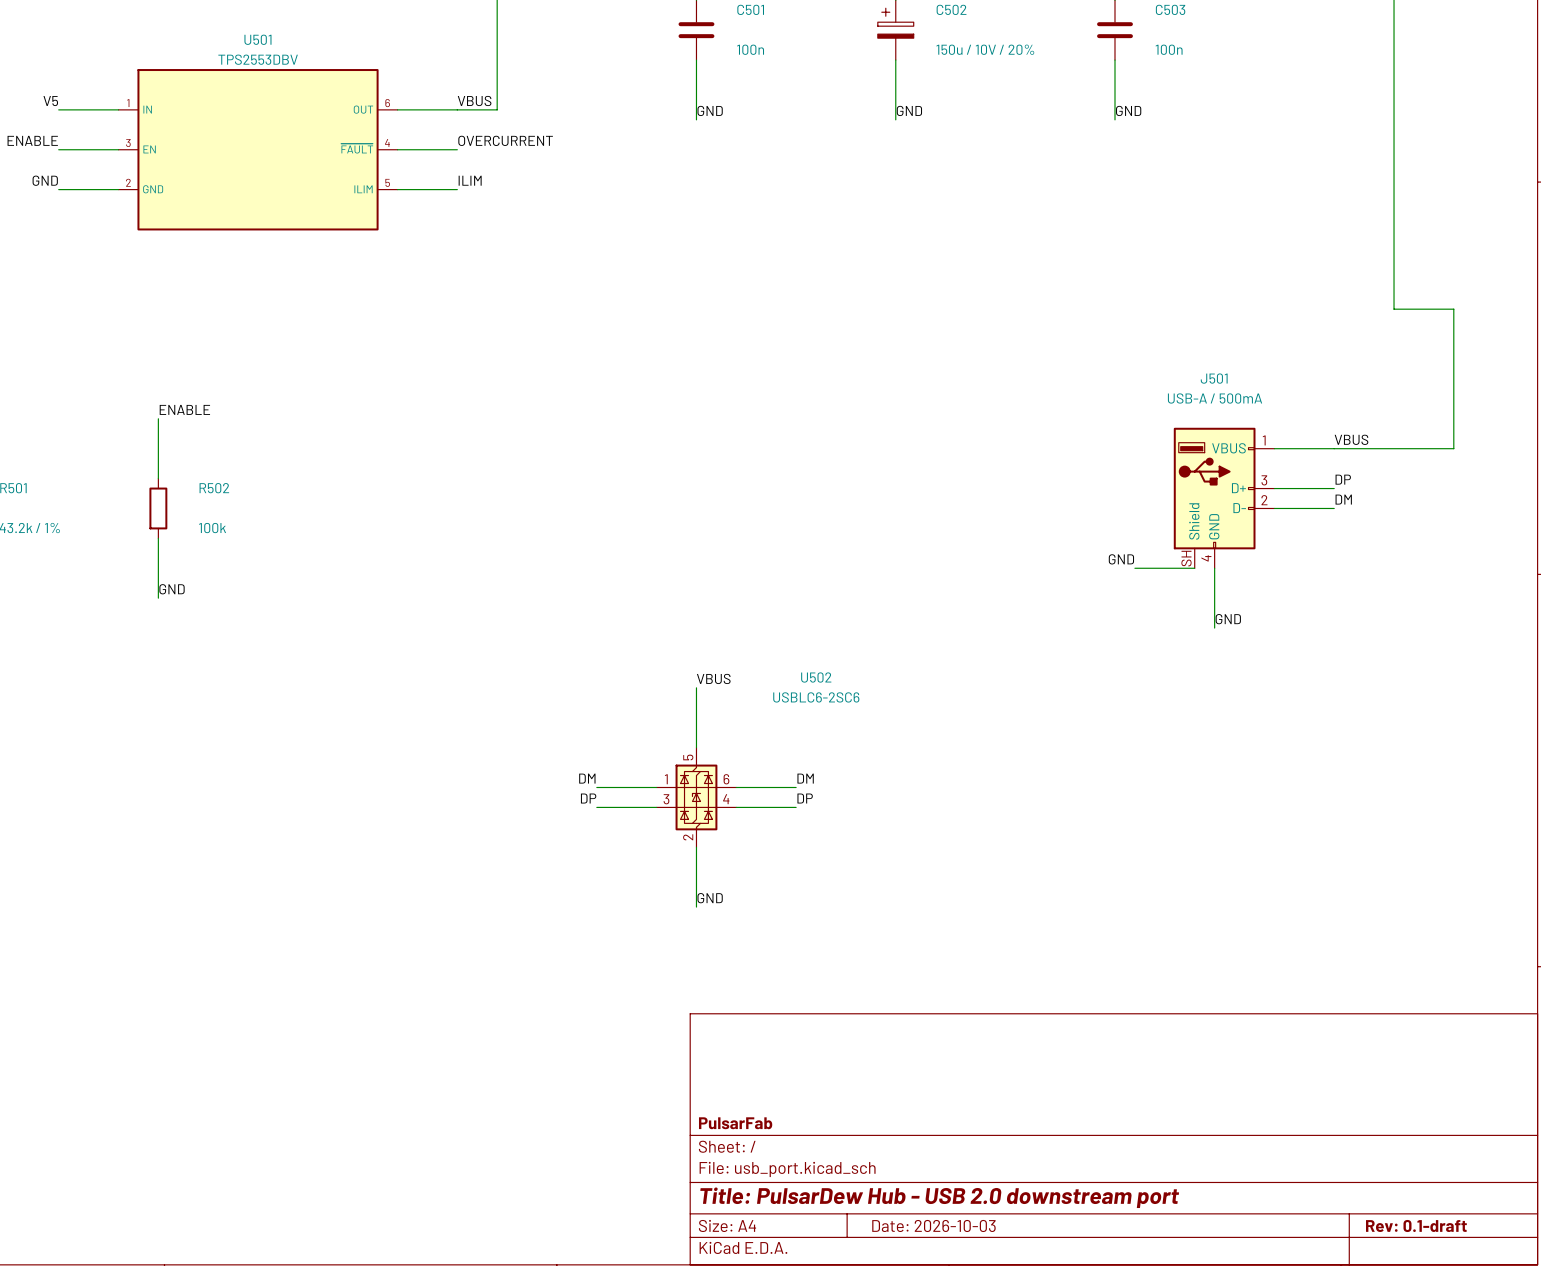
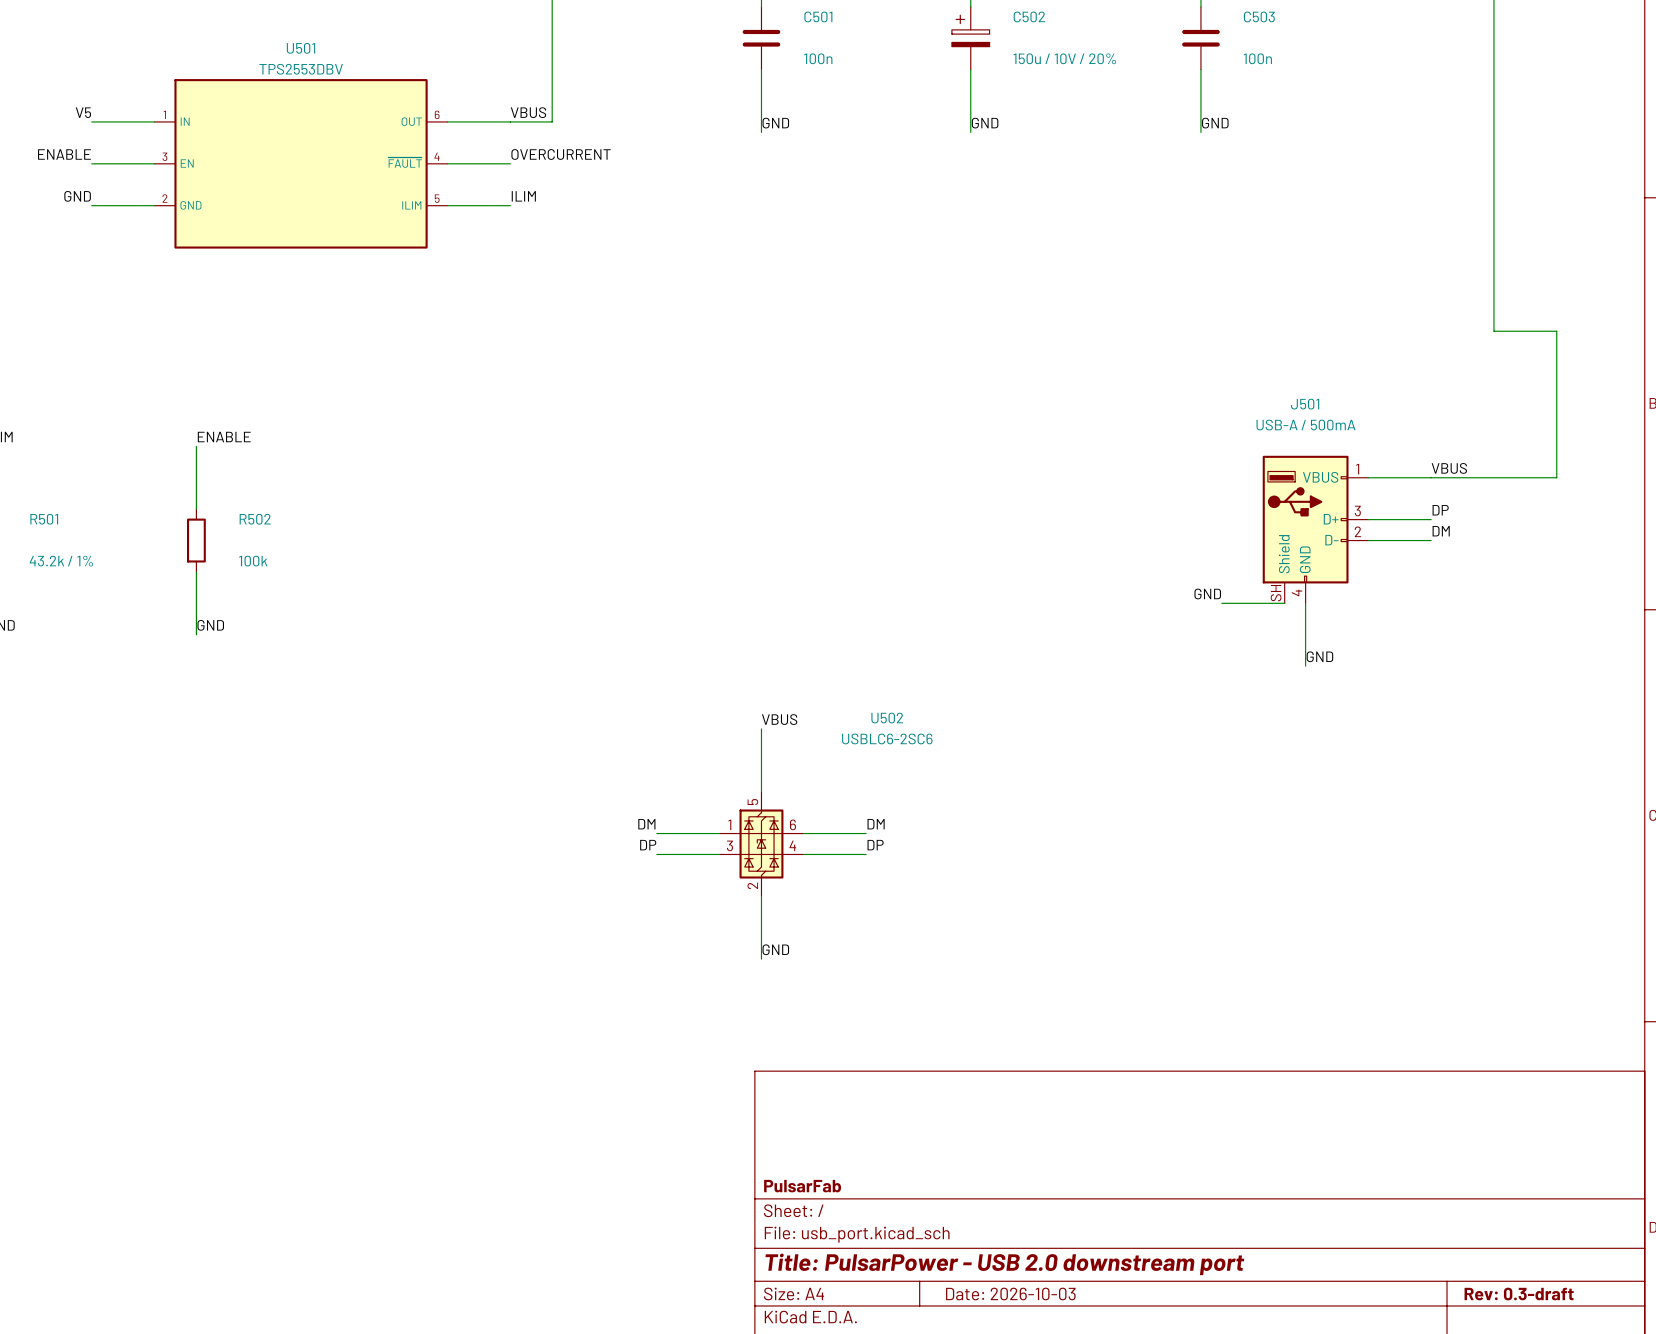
title block: Title: PulsarDew Hub - USB 2.0 downstream port (939, 1197) -> Title: PulsarPower - USB 2.0 downstream port (1004, 1264)
title block: Rev: 0.1-draft (1416, 1226) -> Rev: 0.3-draft (1519, 1294)

